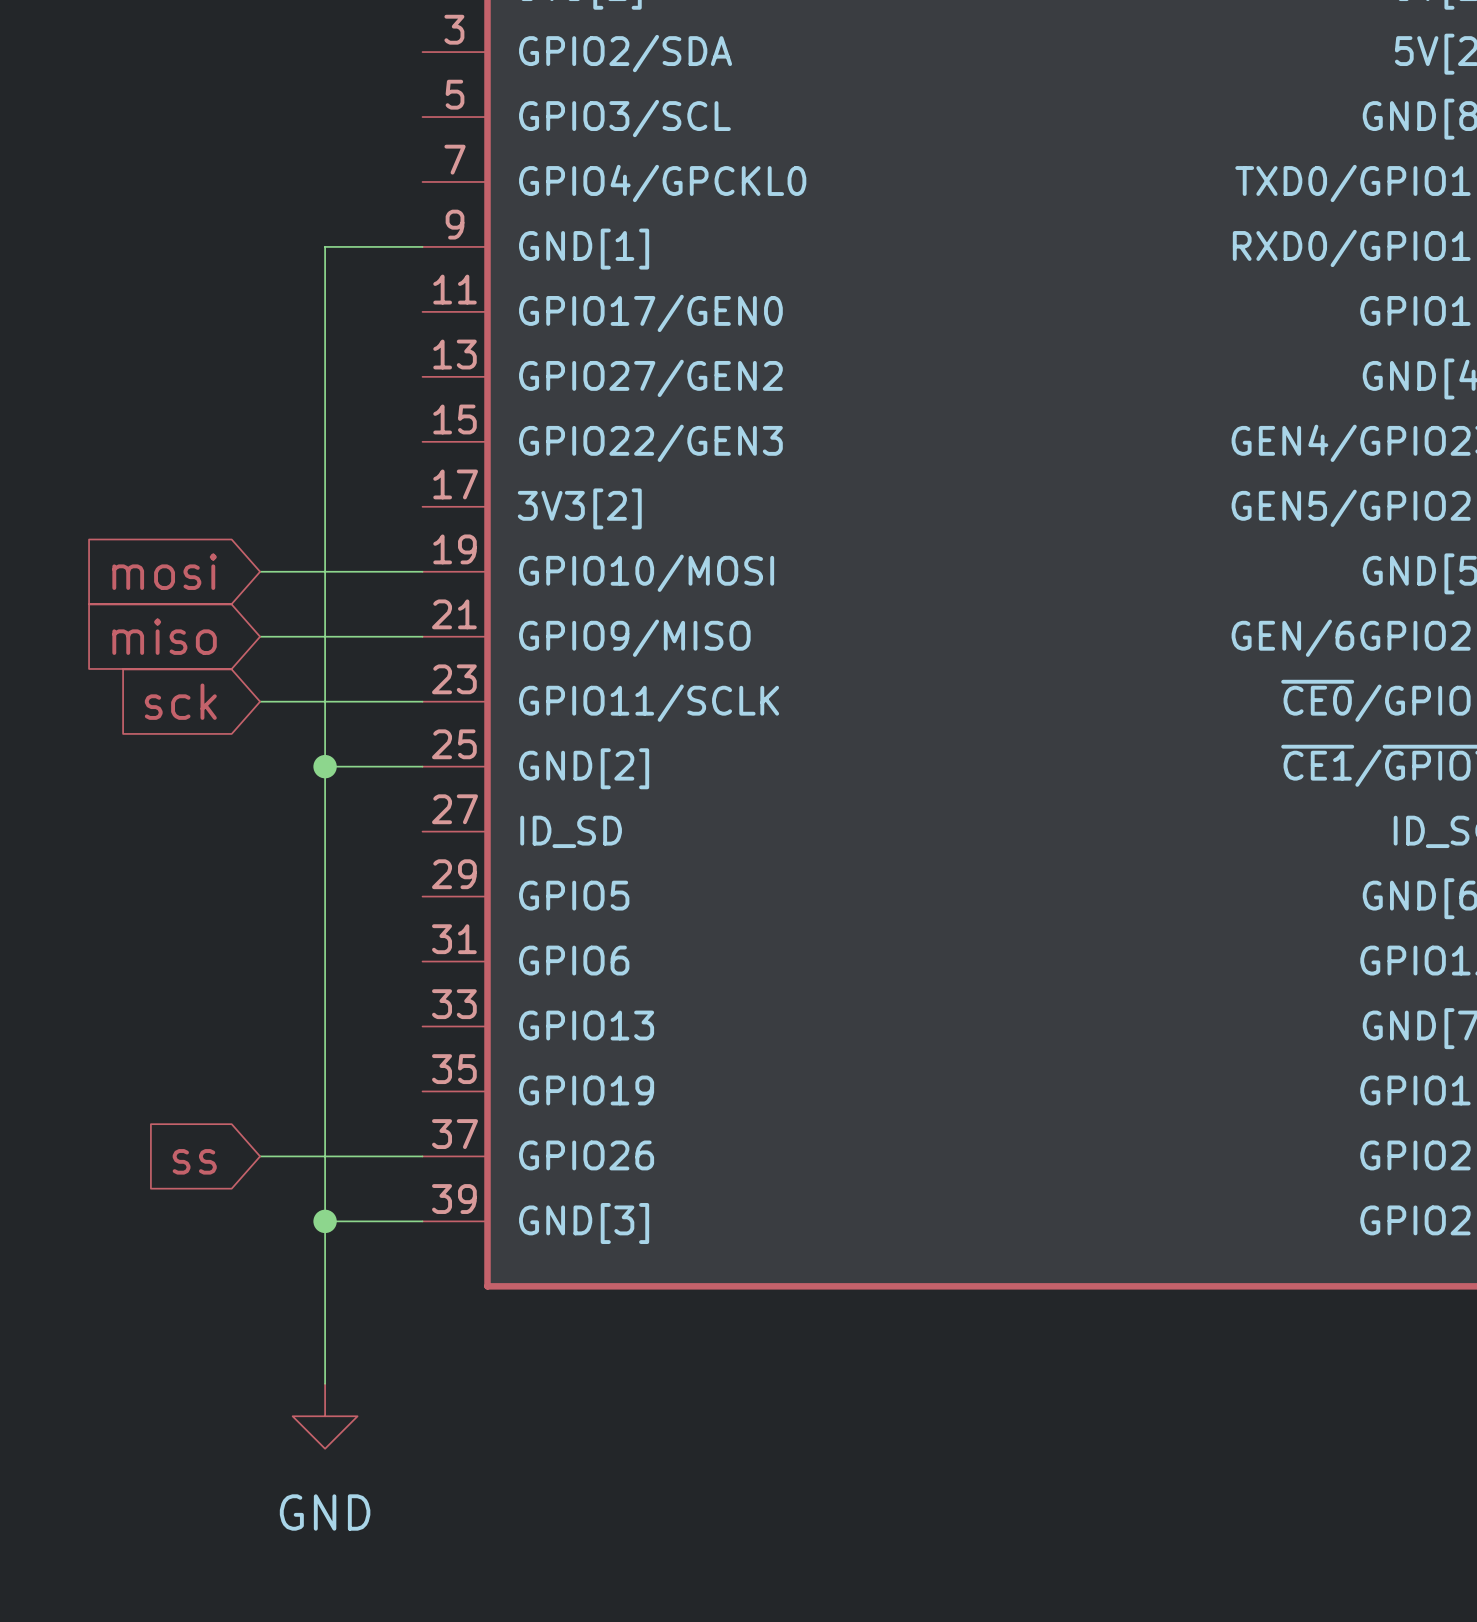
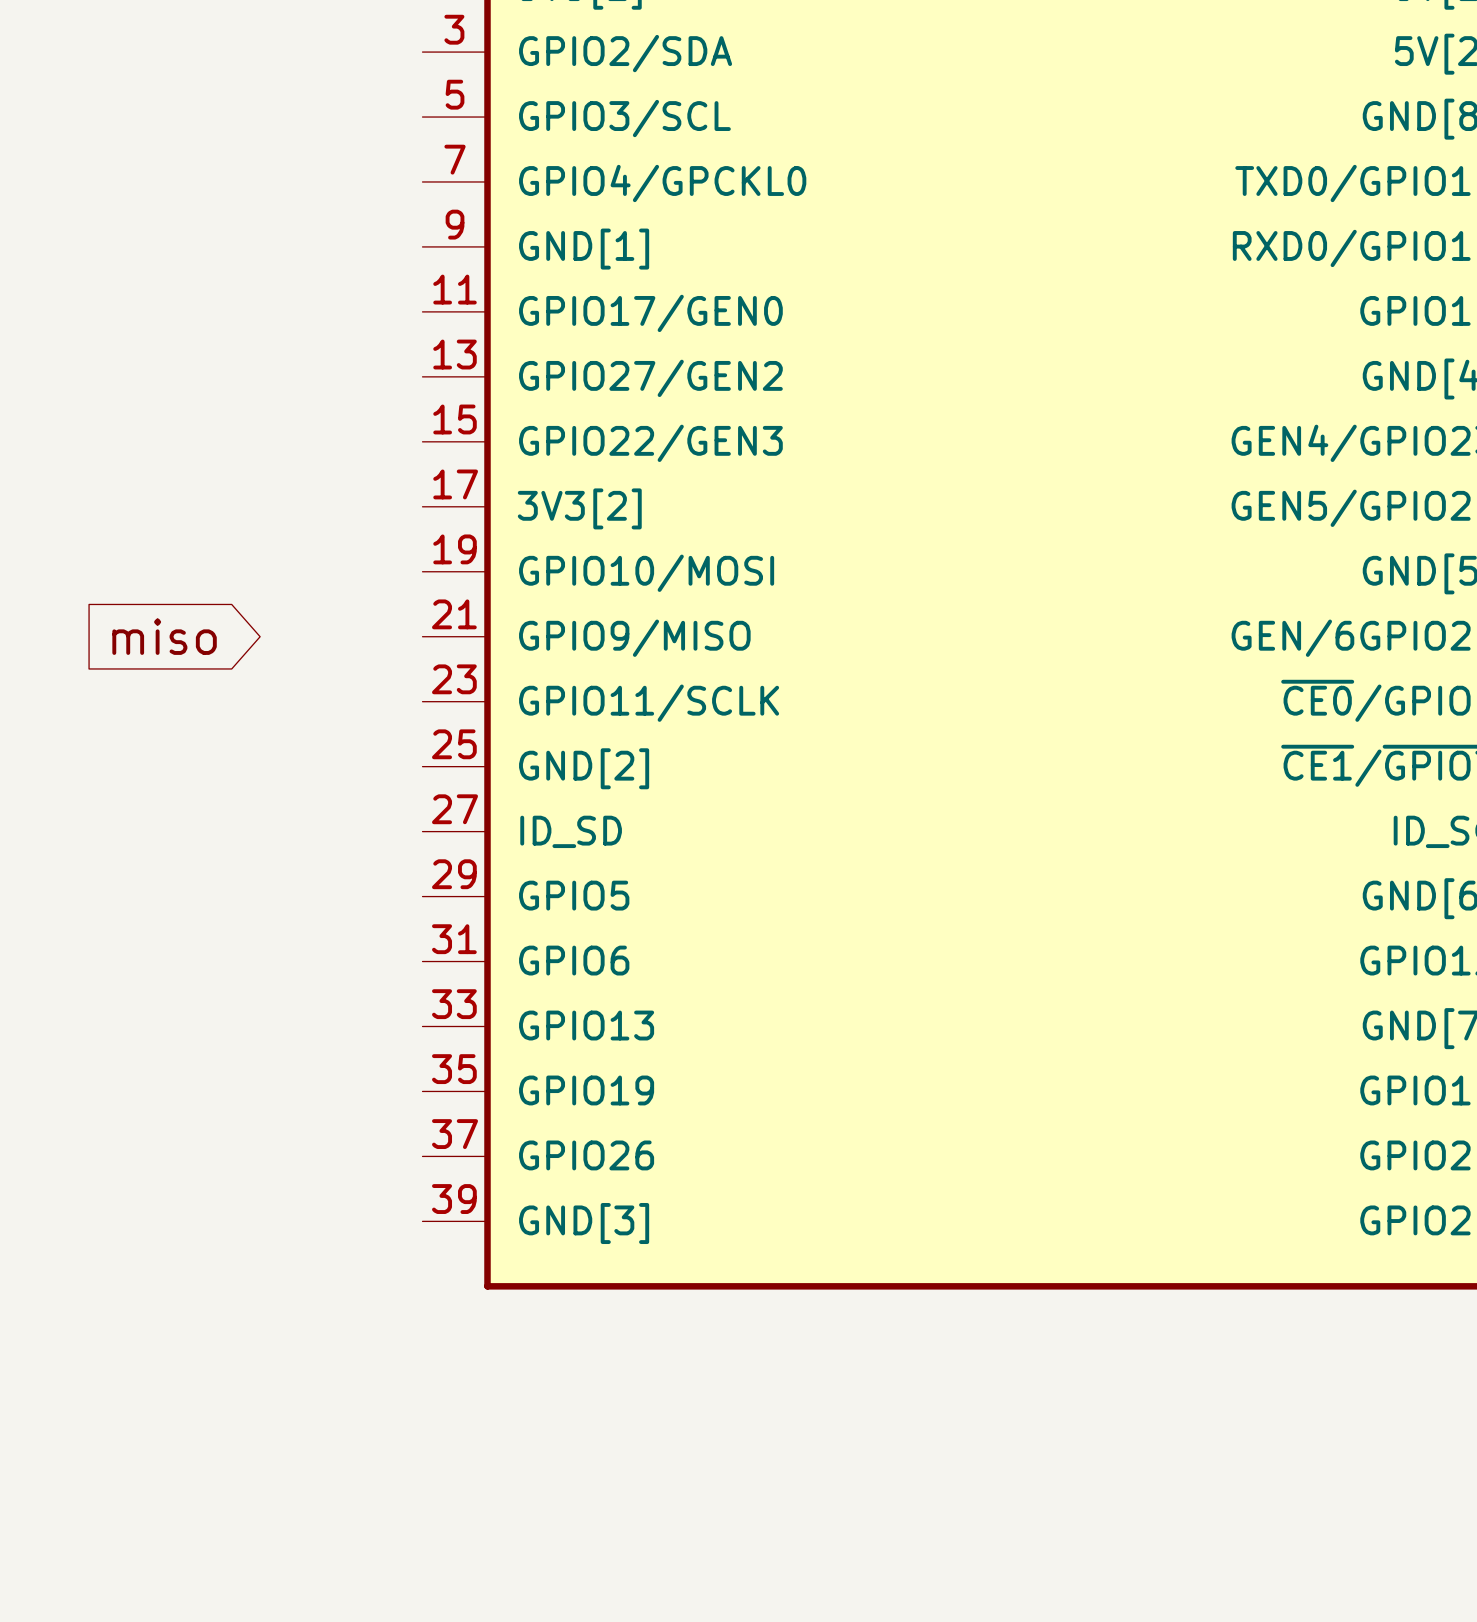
wire: (422, 246) (325, 246) (325, 1383) -> none
global label: mosi (164, 571) -> none
wire: (260, 571) (422, 571) -> none
wire: (260, 636) (422, 636) -> none
global label: sck (180, 701) -> none
wire: (260, 701) (422, 701) -> none
wire: (325, 766) (422, 766) -> none
junction: (325, 766) -> none
wire: (260, 1156) (422, 1156) -> none
global label: ss (194, 1161) -> none
wire: (325, 1221) (422, 1221) -> none
junction: (325, 1221) -> none
power symbol: GND (325, 1416) -> none

